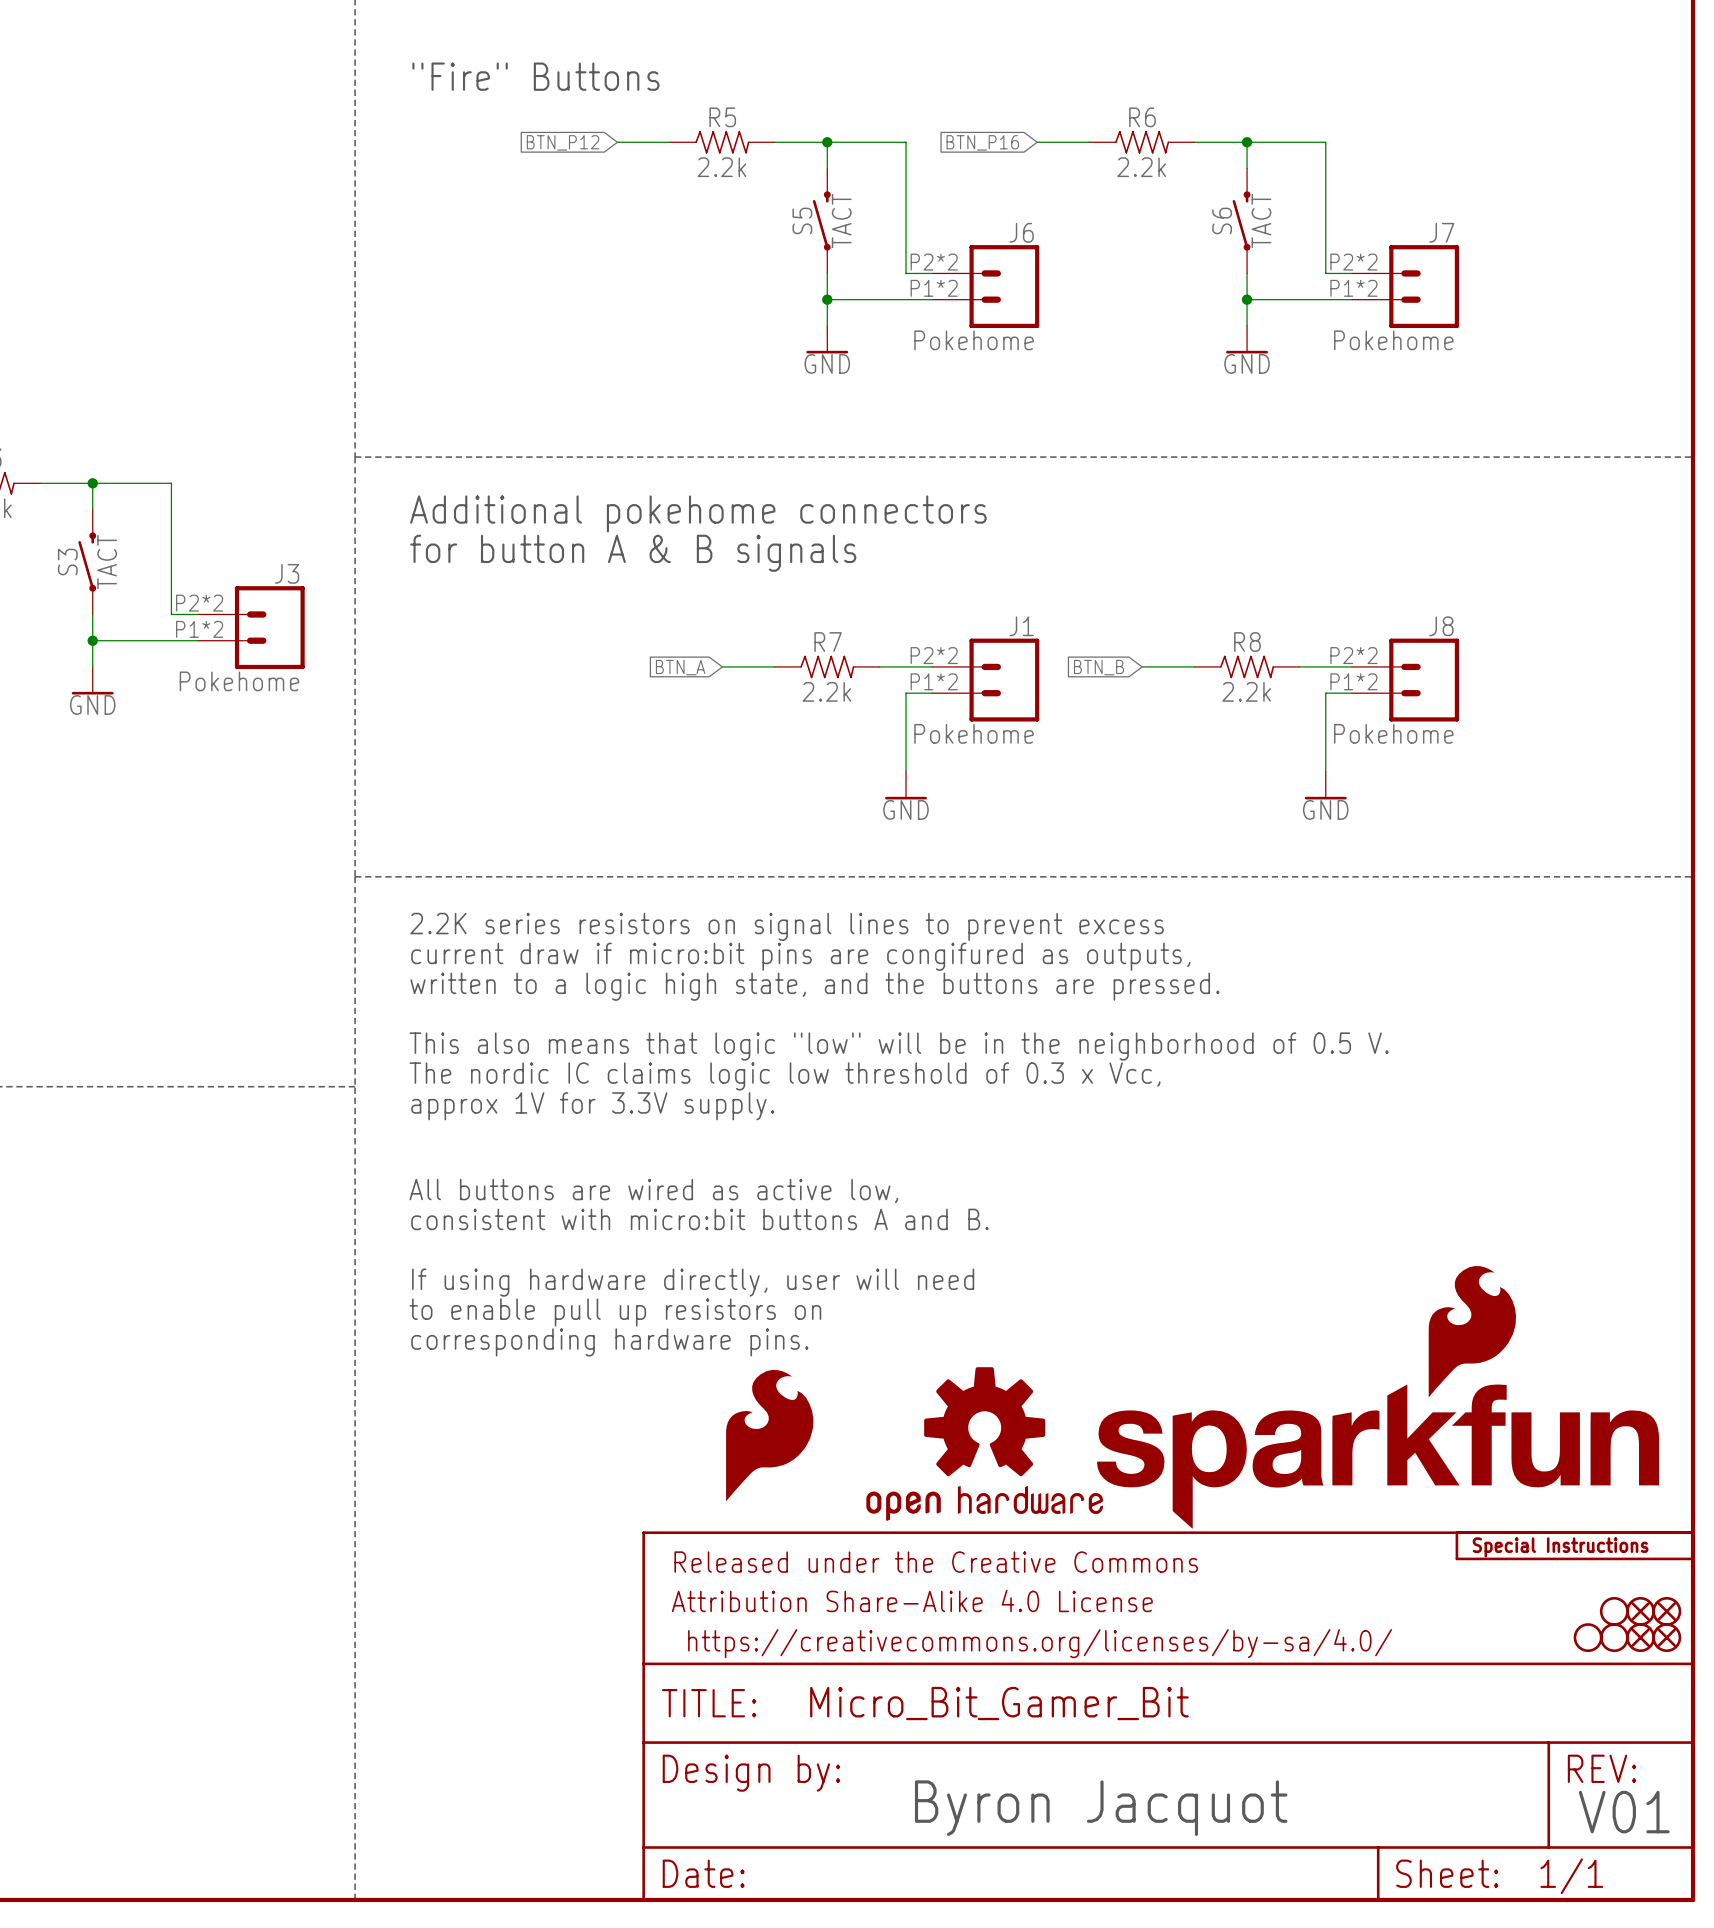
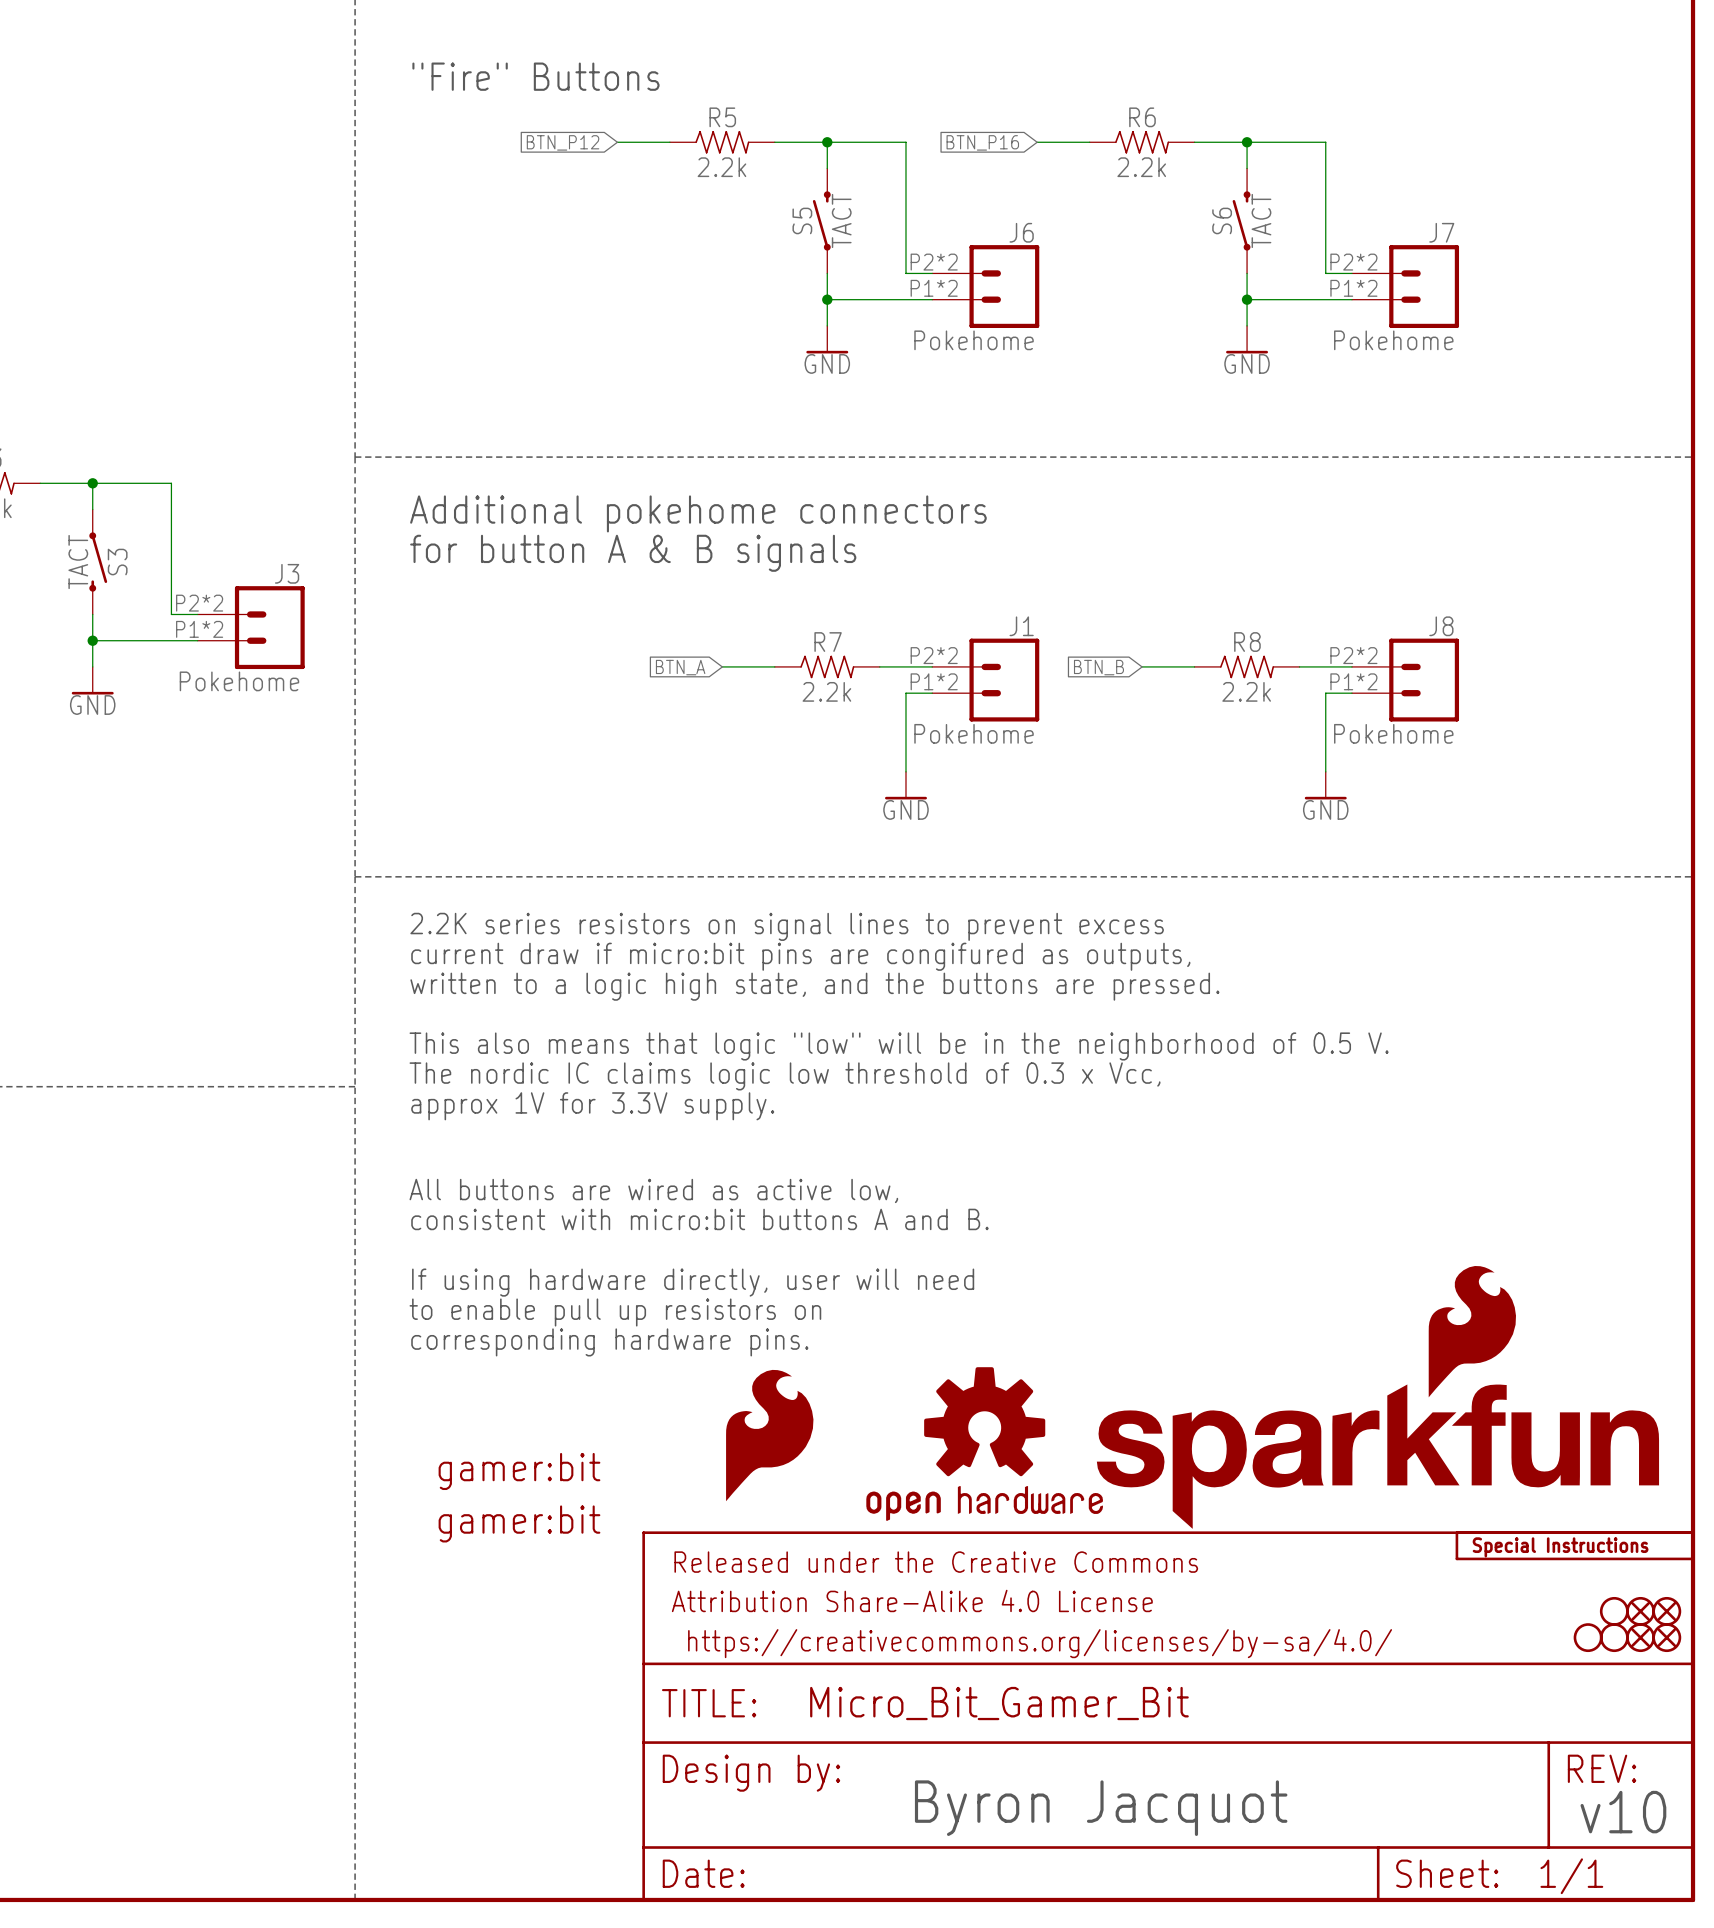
S3 rotation: 0° (87, 562) -> 180° (98, 562)
part: none -> (519, 1471)
part: none -> (519, 1523)
text: V01 (1624, 1812) -> v10 (1623, 1812)

